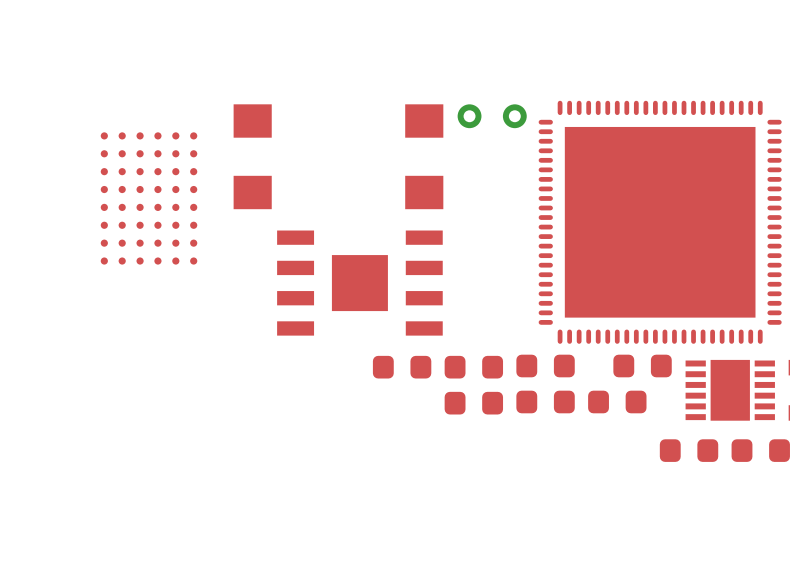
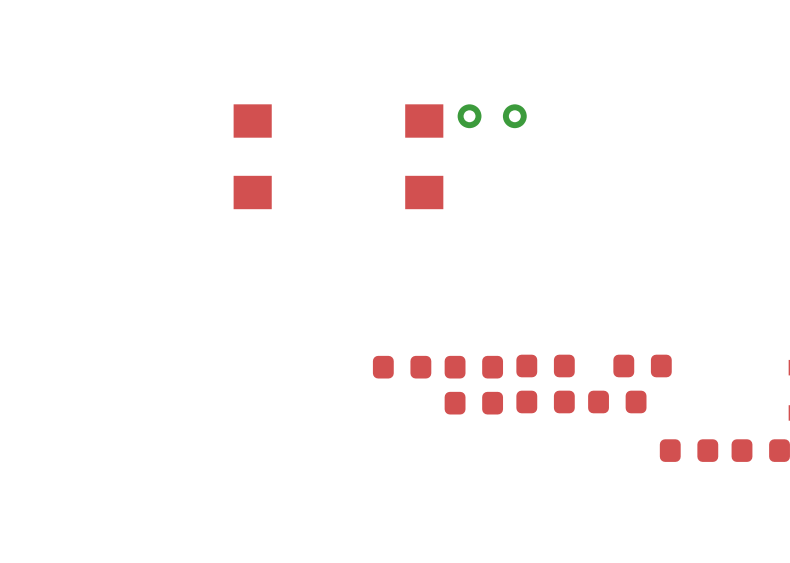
part: (149, 198) -> none
part: (660, 222) -> none
part: (359, 283) -> none
part: (730, 390) -> none

